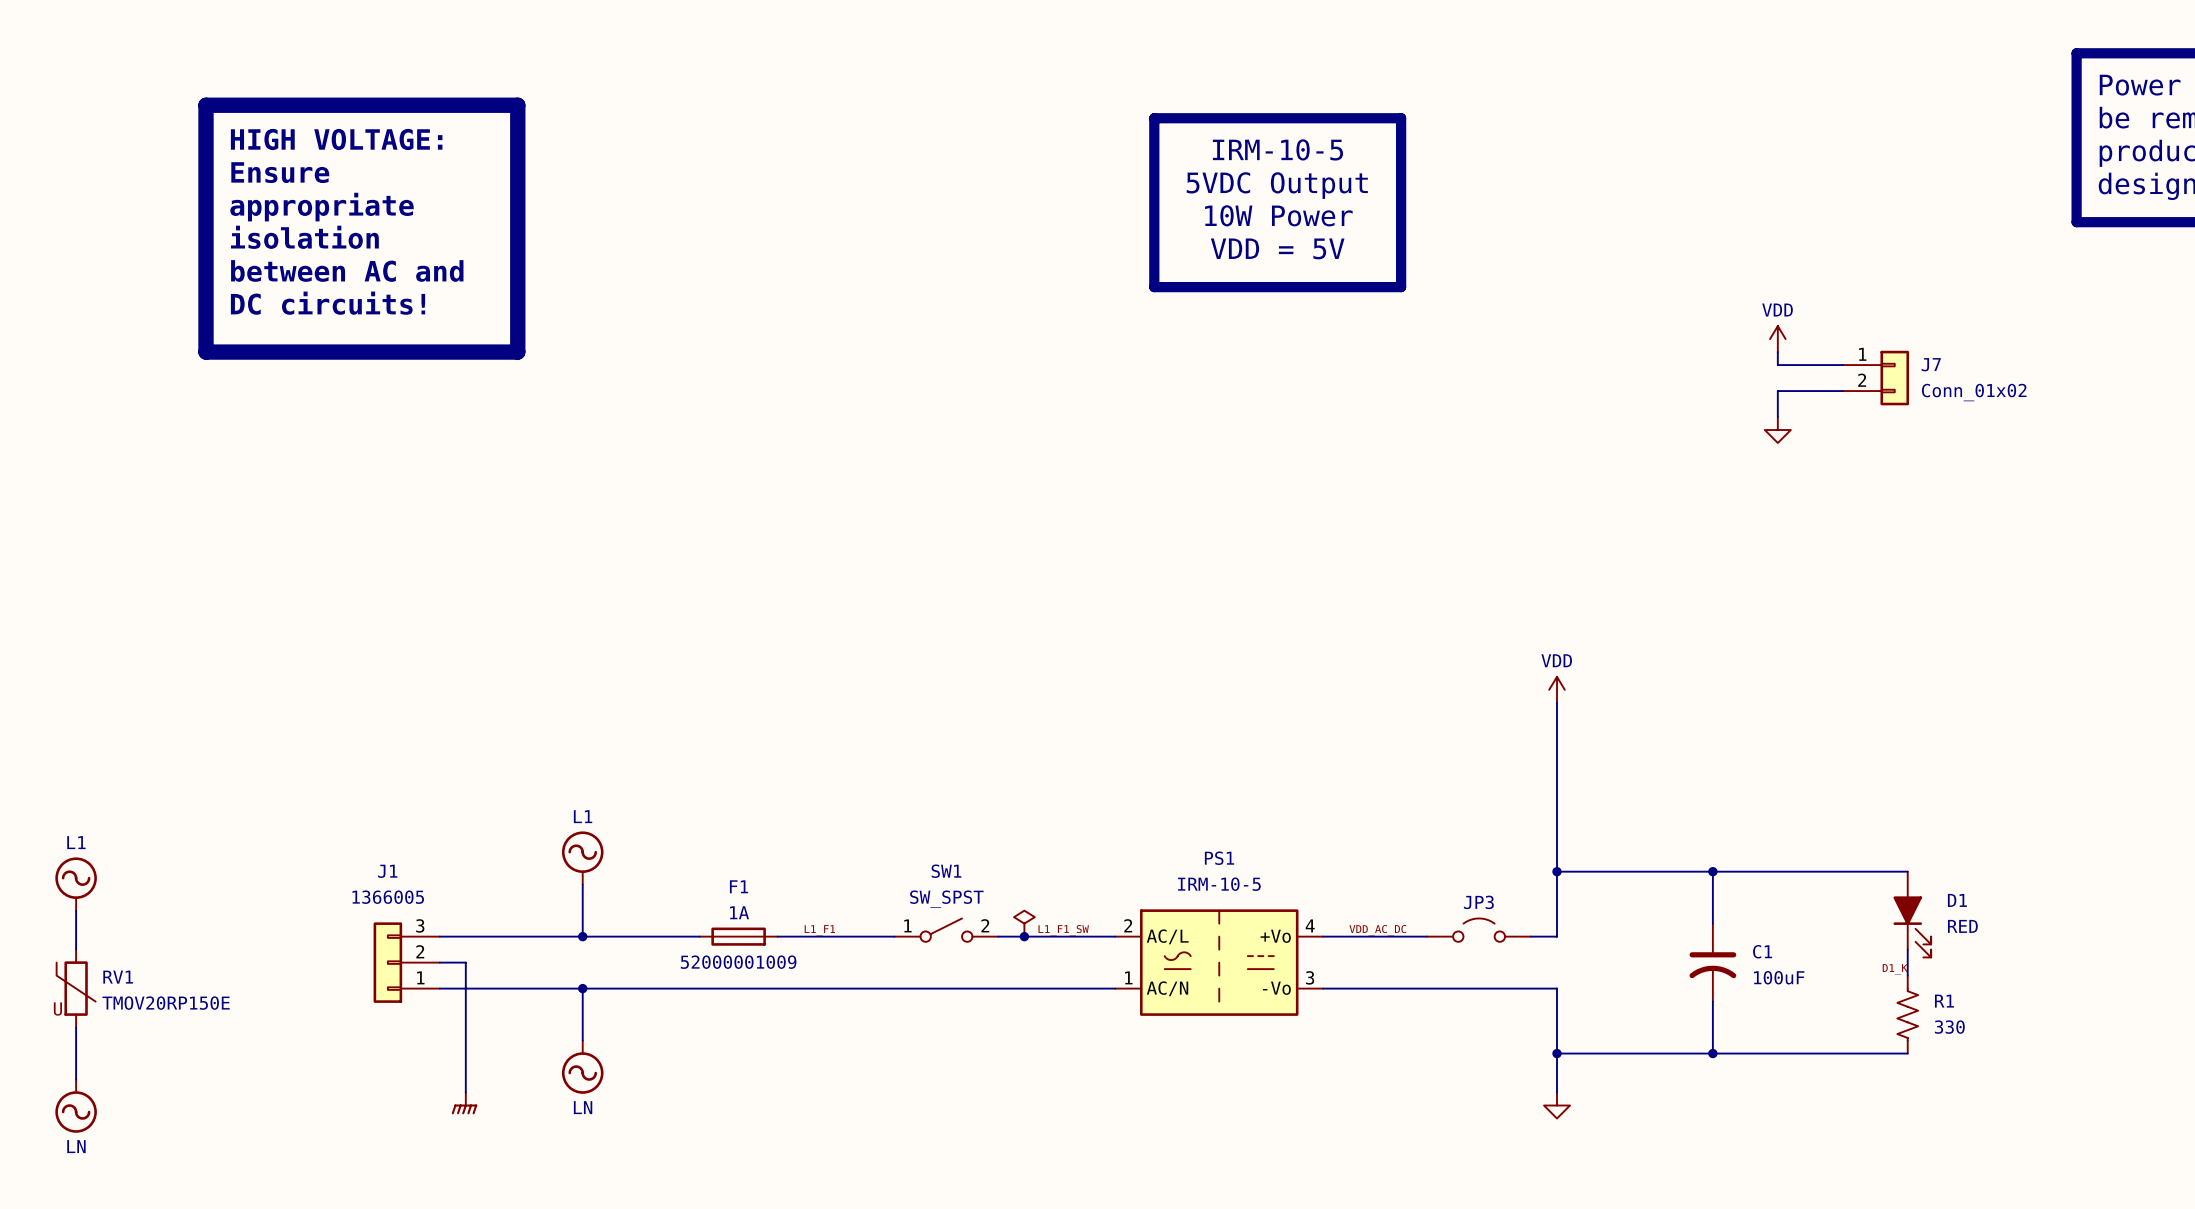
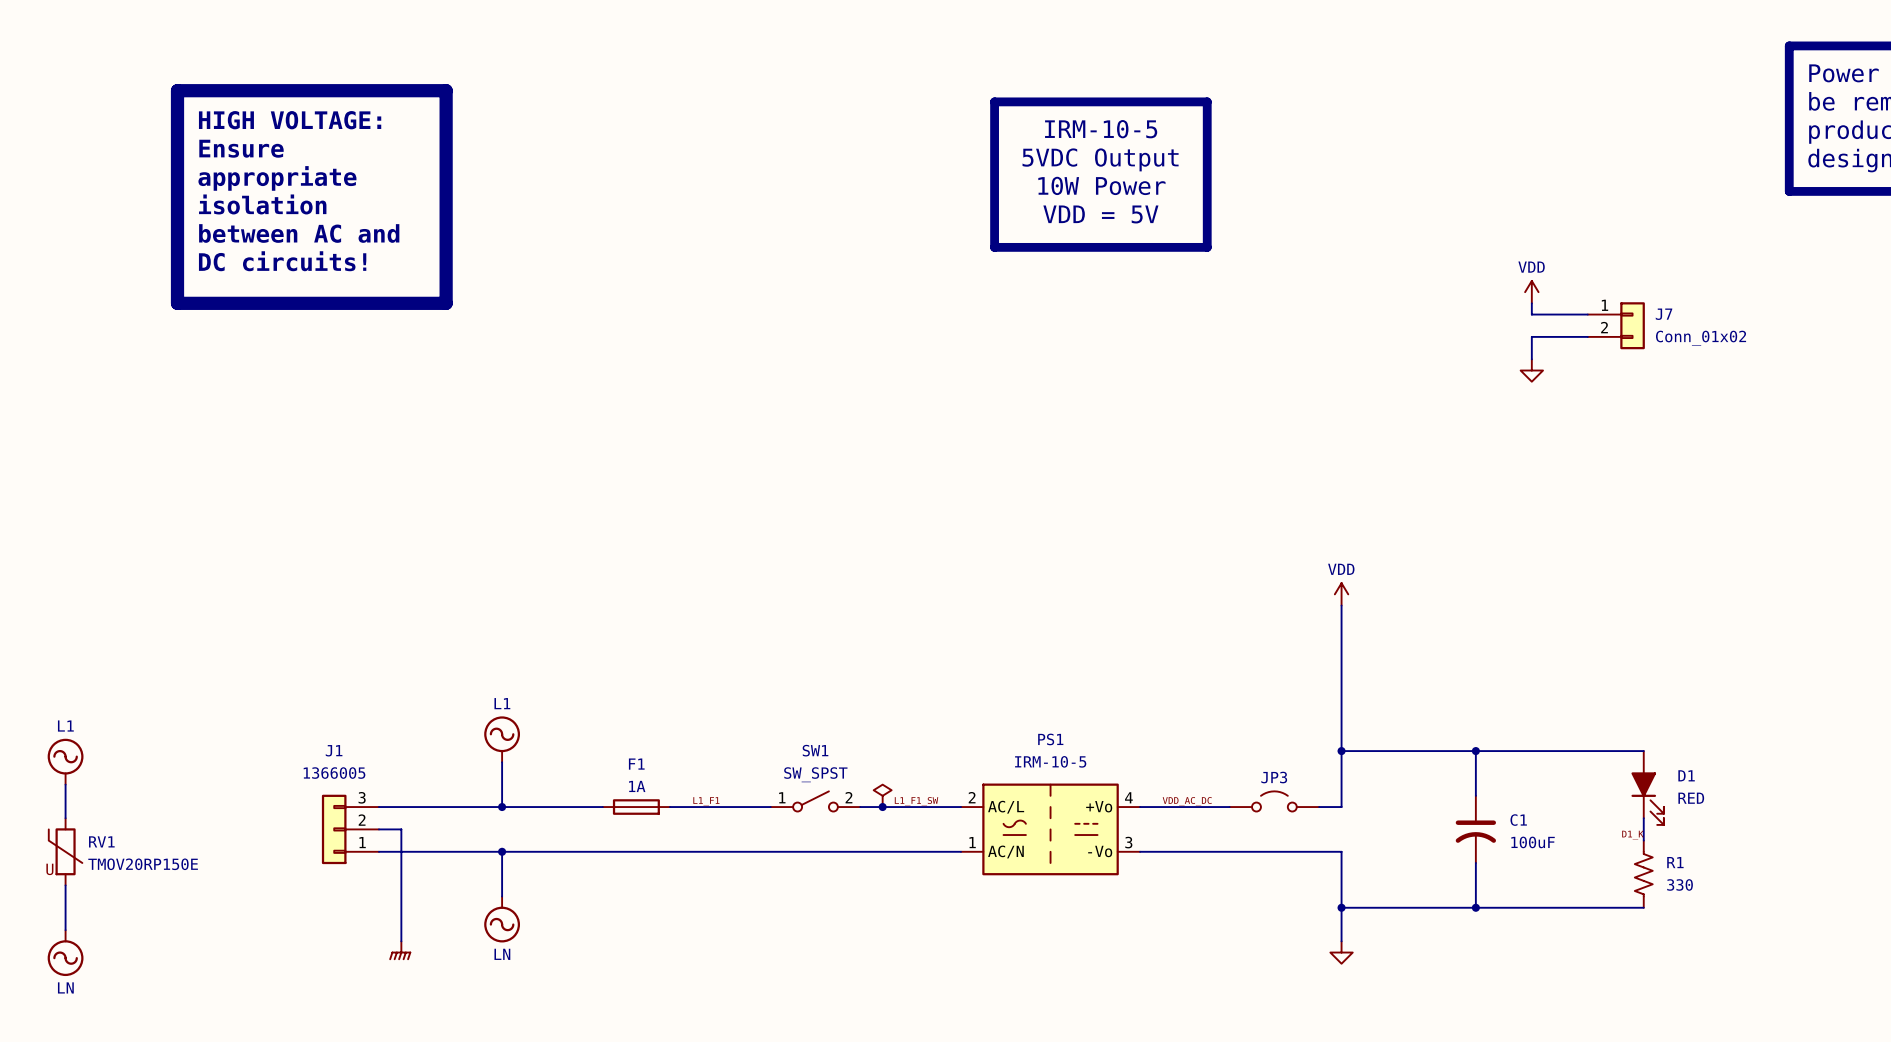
text: 52000001009 (738, 962) -> none

